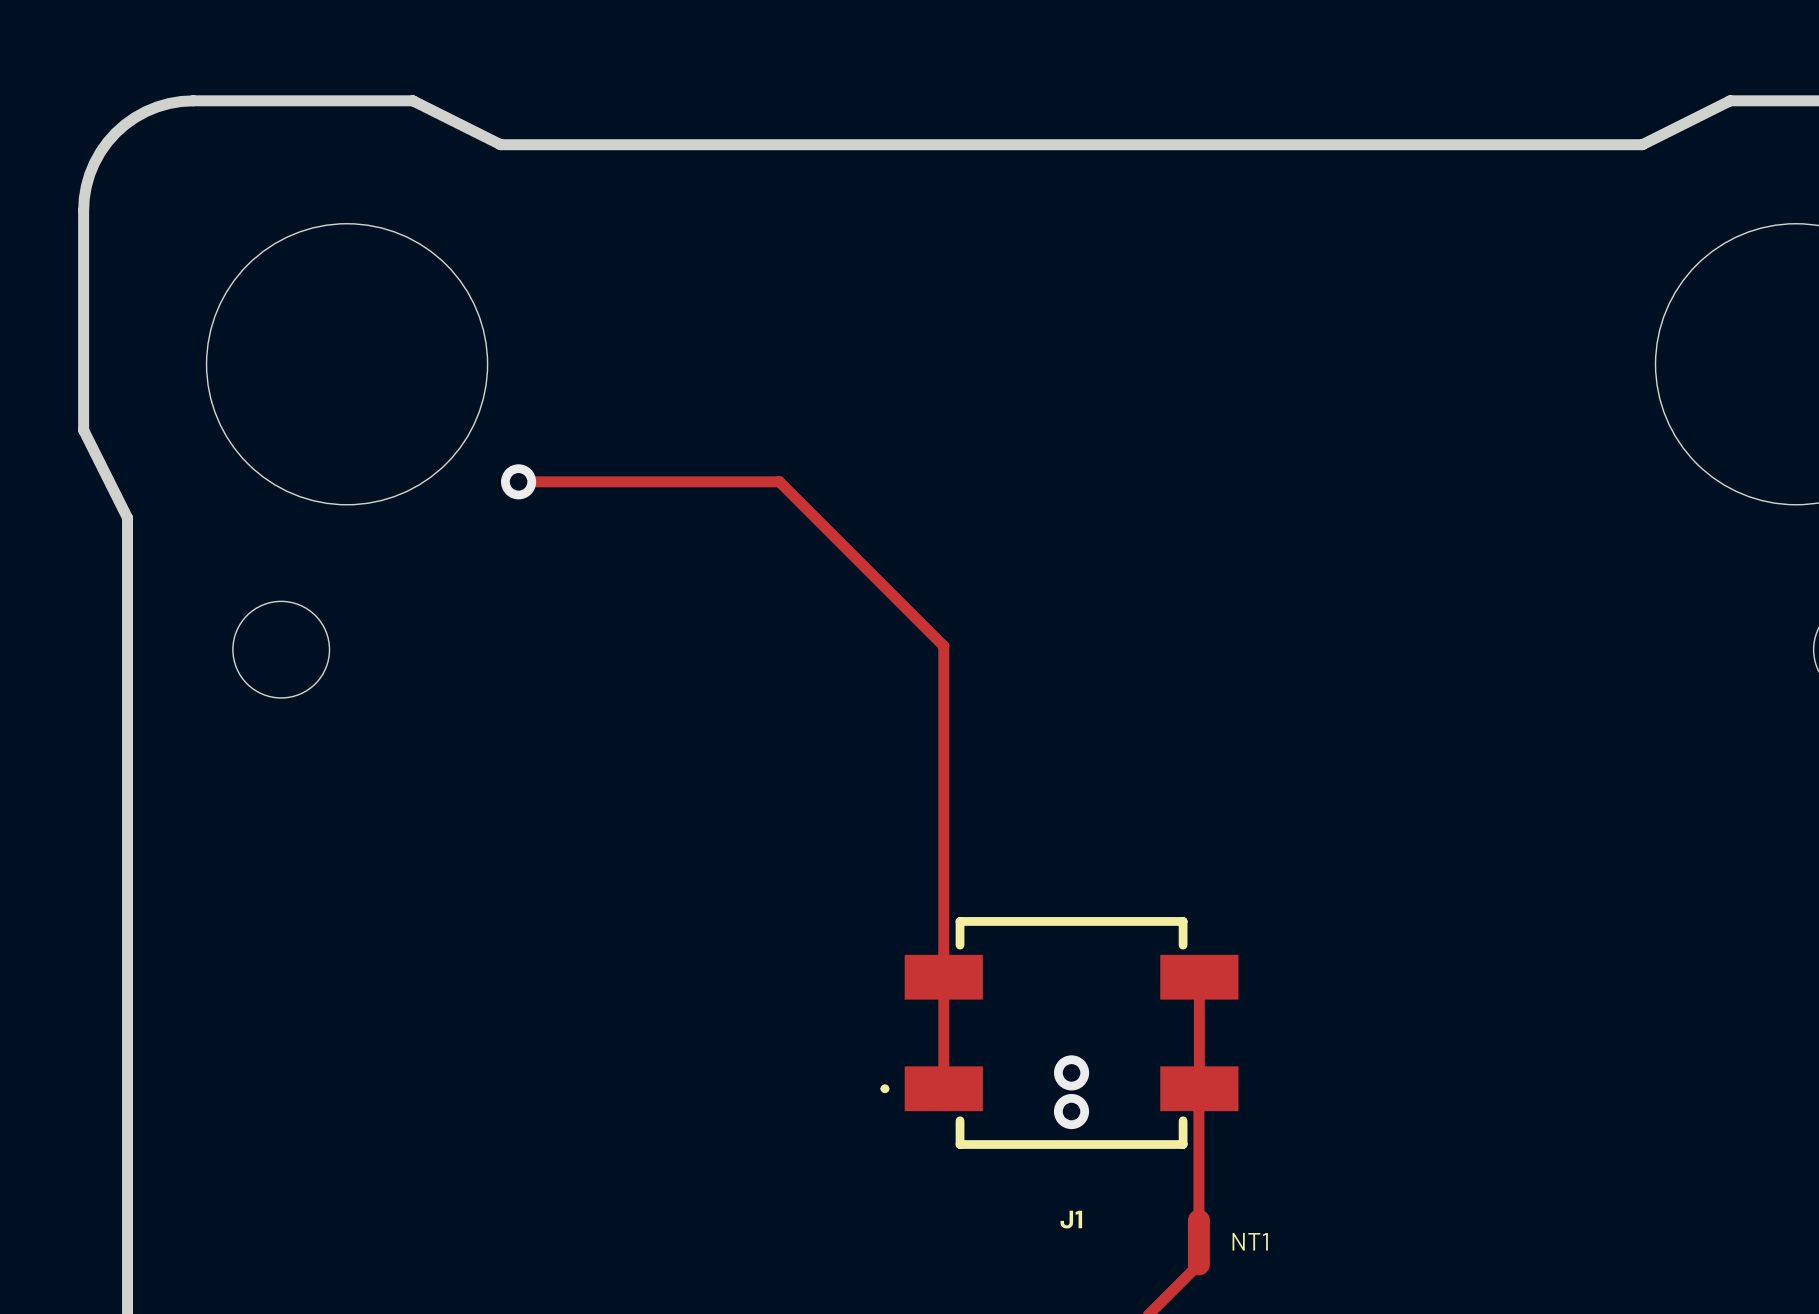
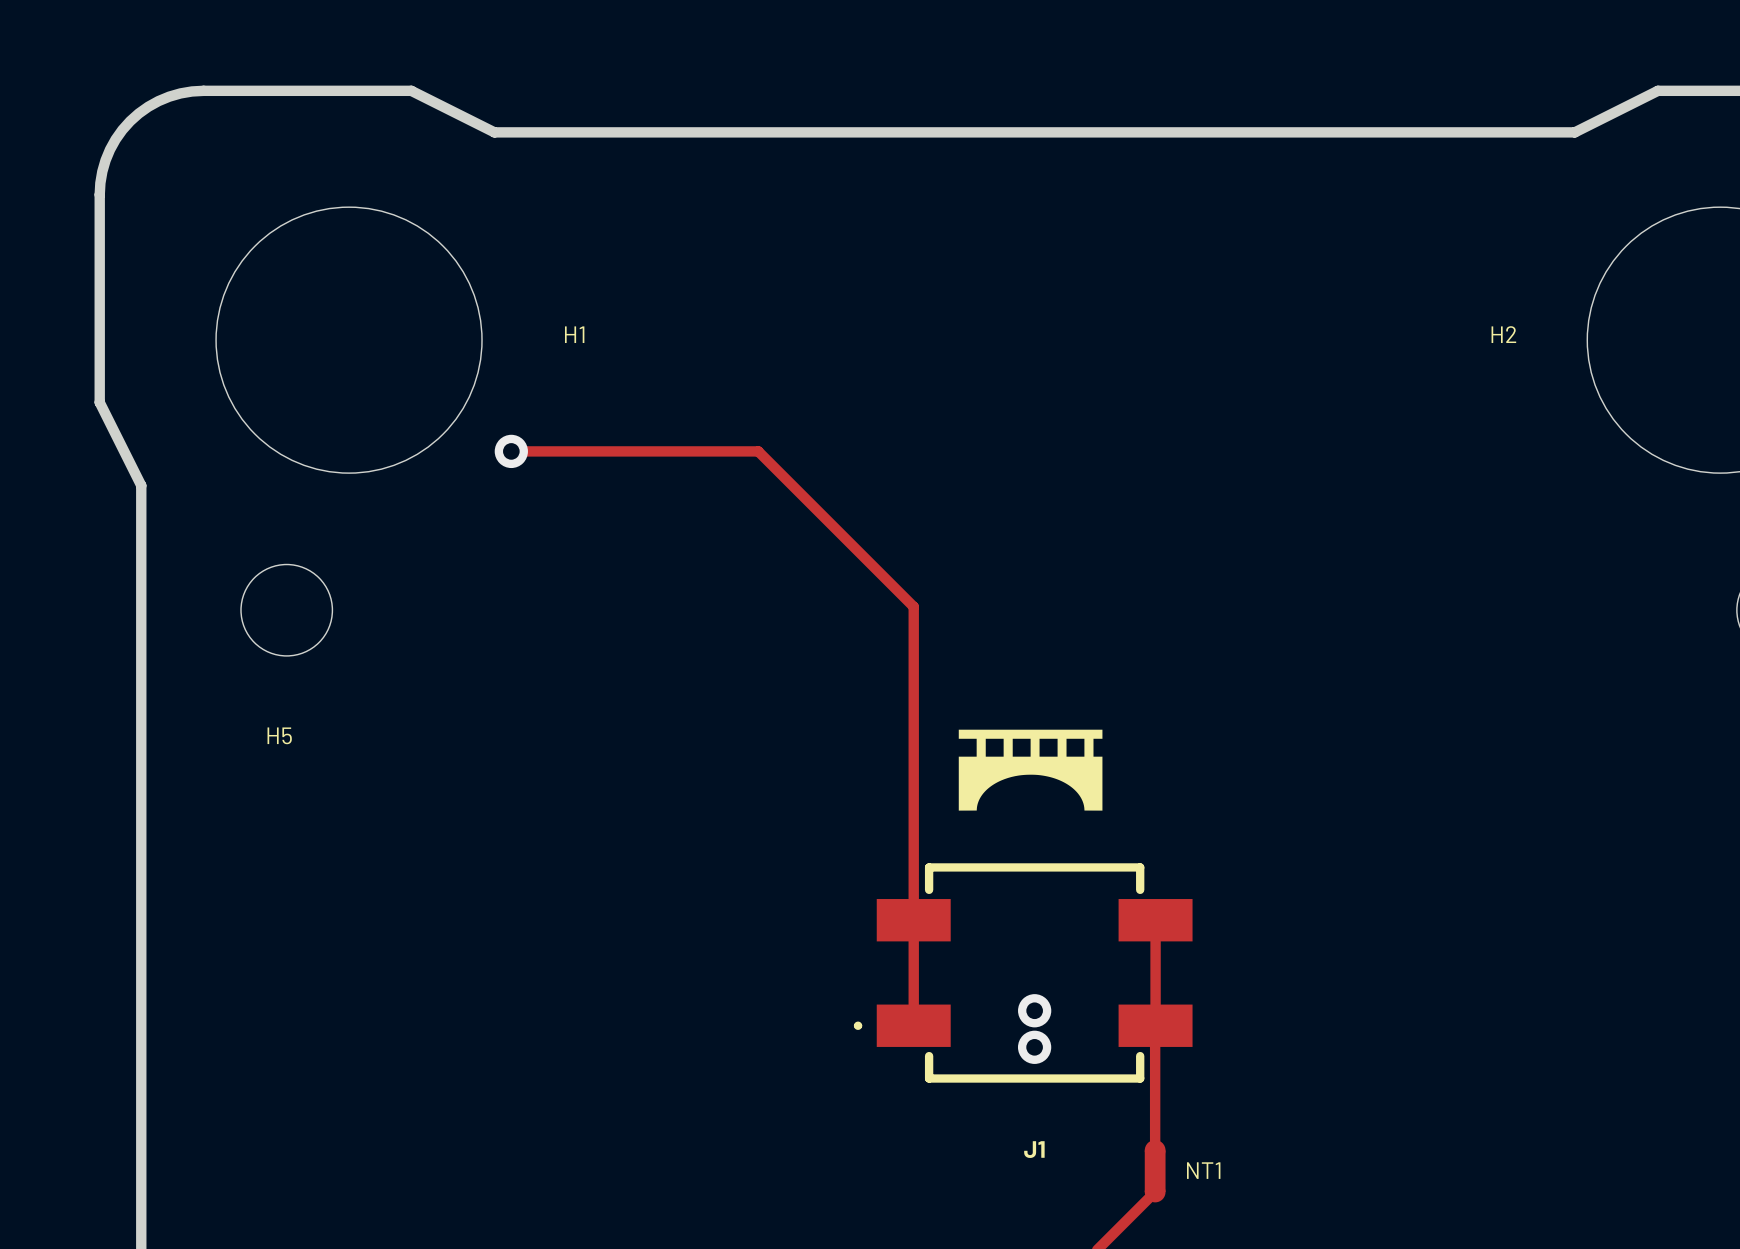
H1 name: none -> H1 (574, 334)
H2 name: none -> H2 (1503, 334)
drawing: none -> [958, 729, 1103, 811]
H5 name: none -> H5 (279, 735)

